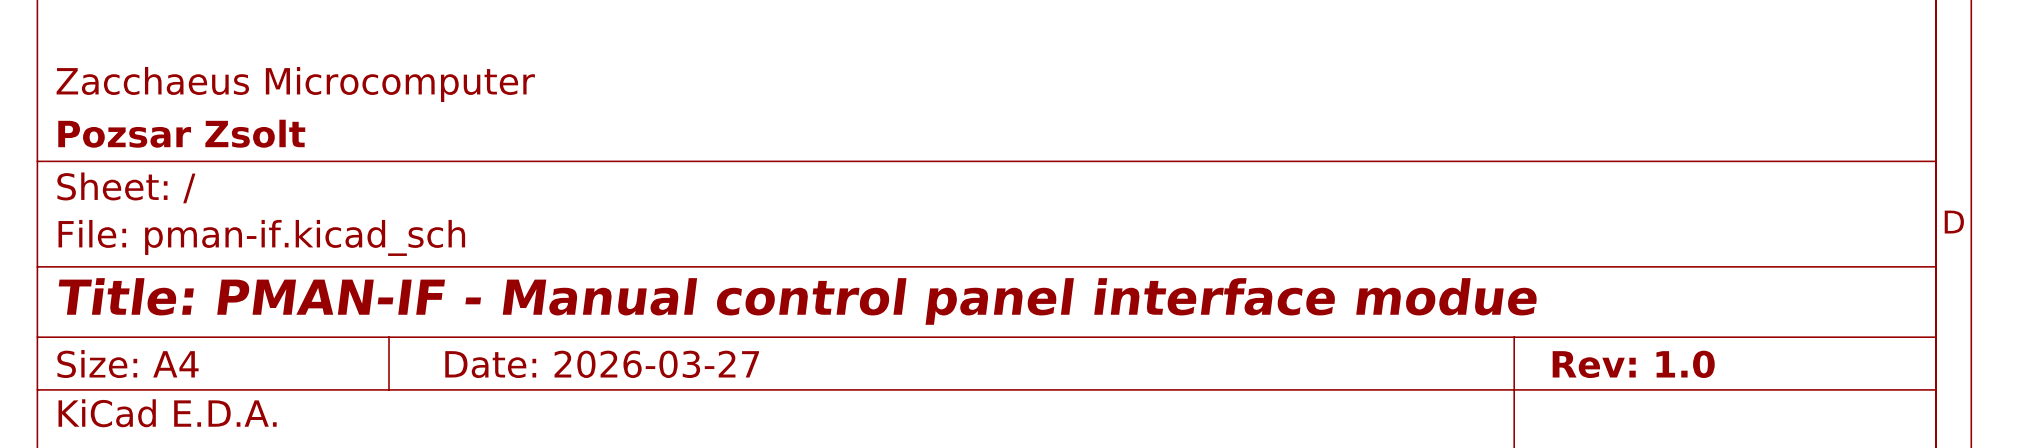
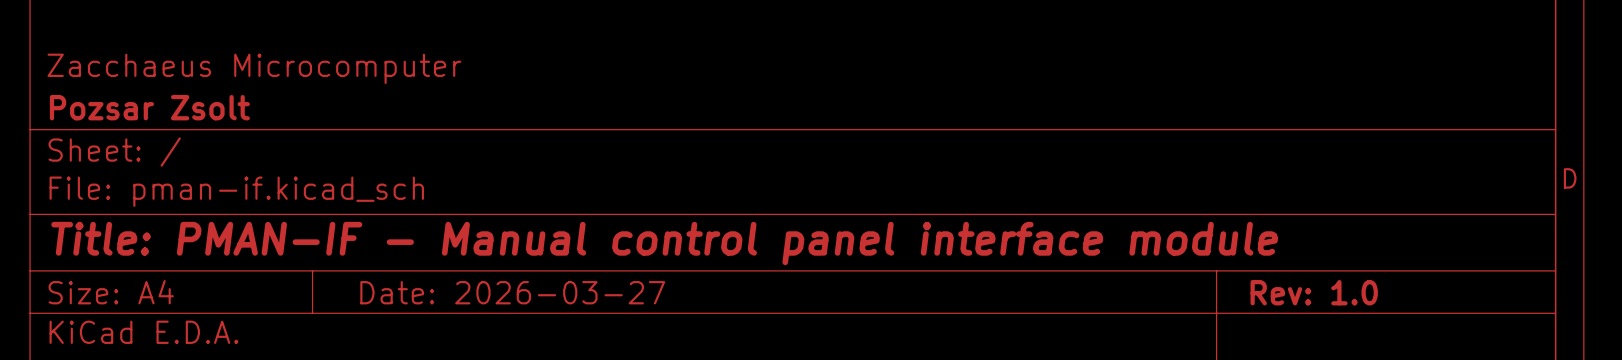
title block: Title: PMAN-IF - Manual control panel interface modue (798, 301) -> Title: PMAN-IF - Manual control panel interface module (664, 243)

